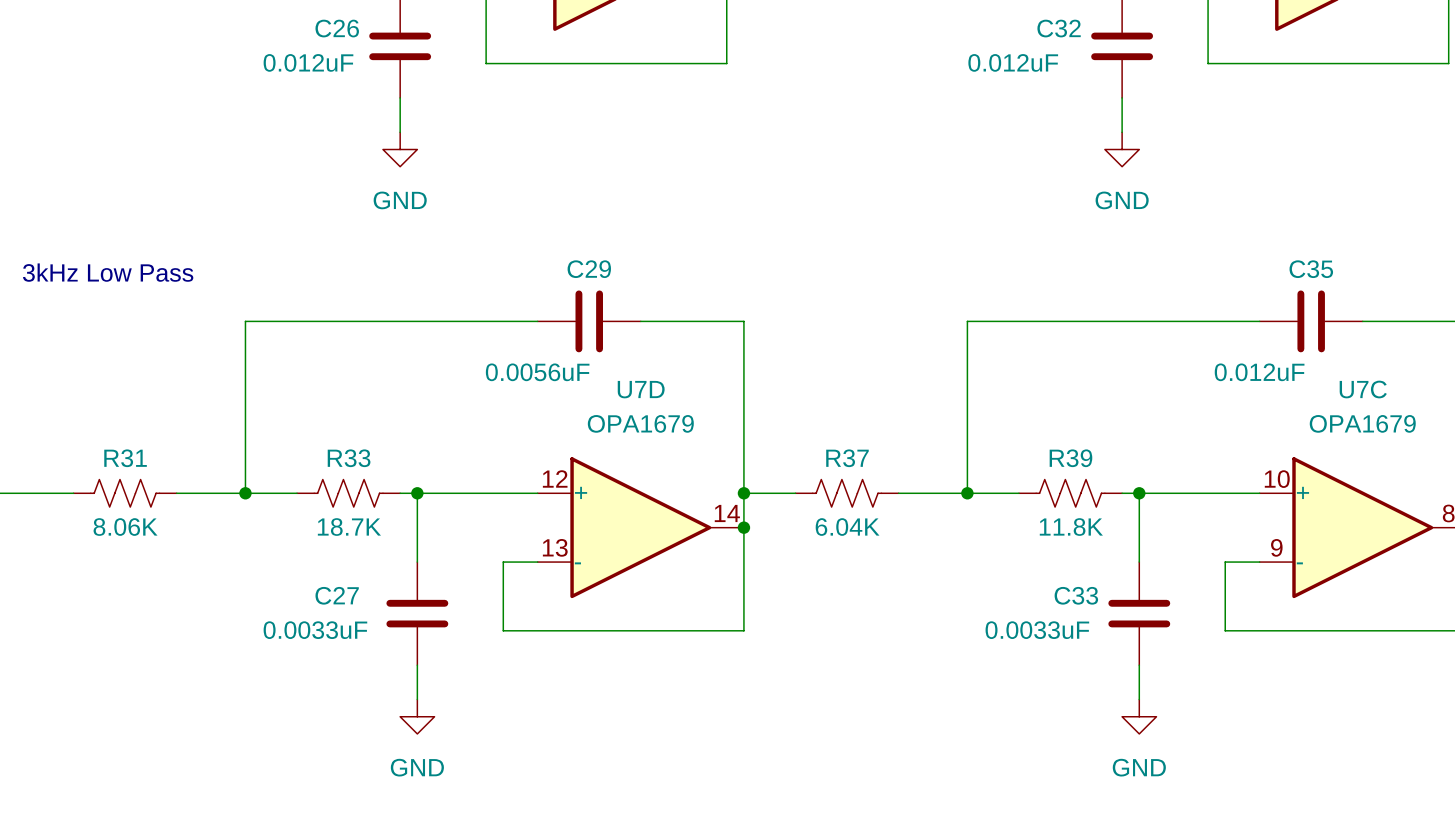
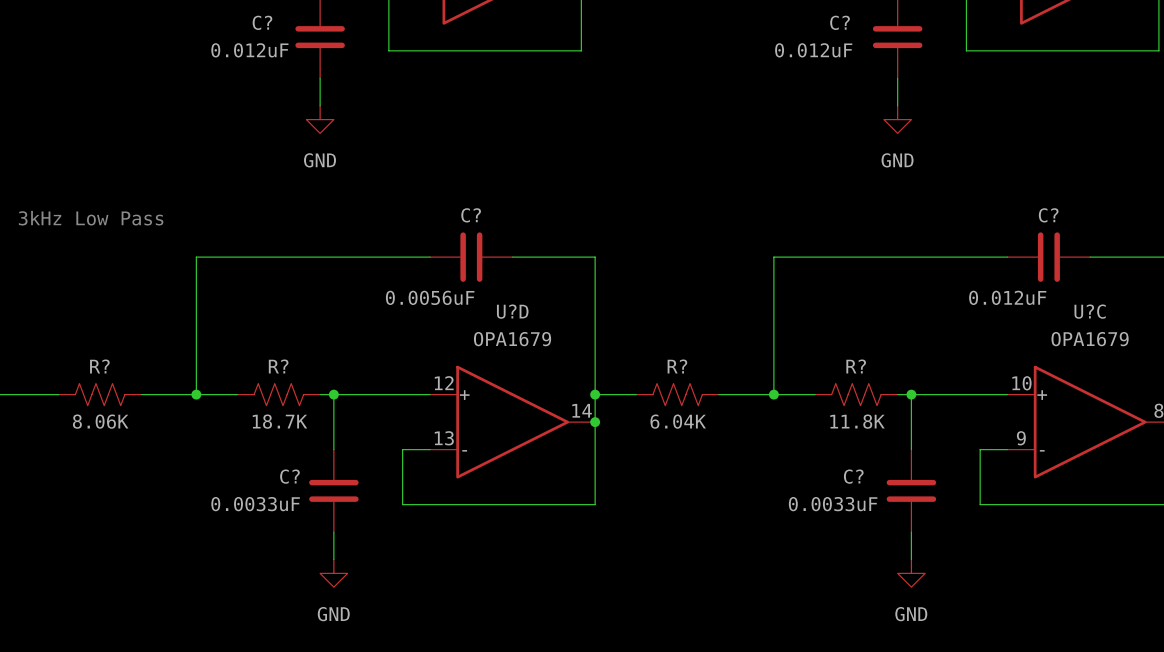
C26 name: C26 (337, 28) -> C? (262, 22)
C32 name: C32 (1059, 28) -> C? (840, 22)
C29 name: C29 (589, 269) -> C? (471, 215)
C35 name: C35 (1311, 269) -> C? (1048, 215)
U7D name: U7D (641, 389) -> U?D (512, 311)
U7C name: U7C (1363, 389) -> U?C (1090, 311)
R31 name: R31 (125, 458) -> R? (99, 366)
R33 name: R33 (349, 458) -> R? (278, 366)
R37 name: R37 (847, 458) -> R? (677, 366)
R39 name: R39 (1070, 458) -> R? (856, 366)
C27 name: C27 (337, 595) -> C? (289, 476)
C33 name: C33 (1076, 595) -> C? (853, 476)

